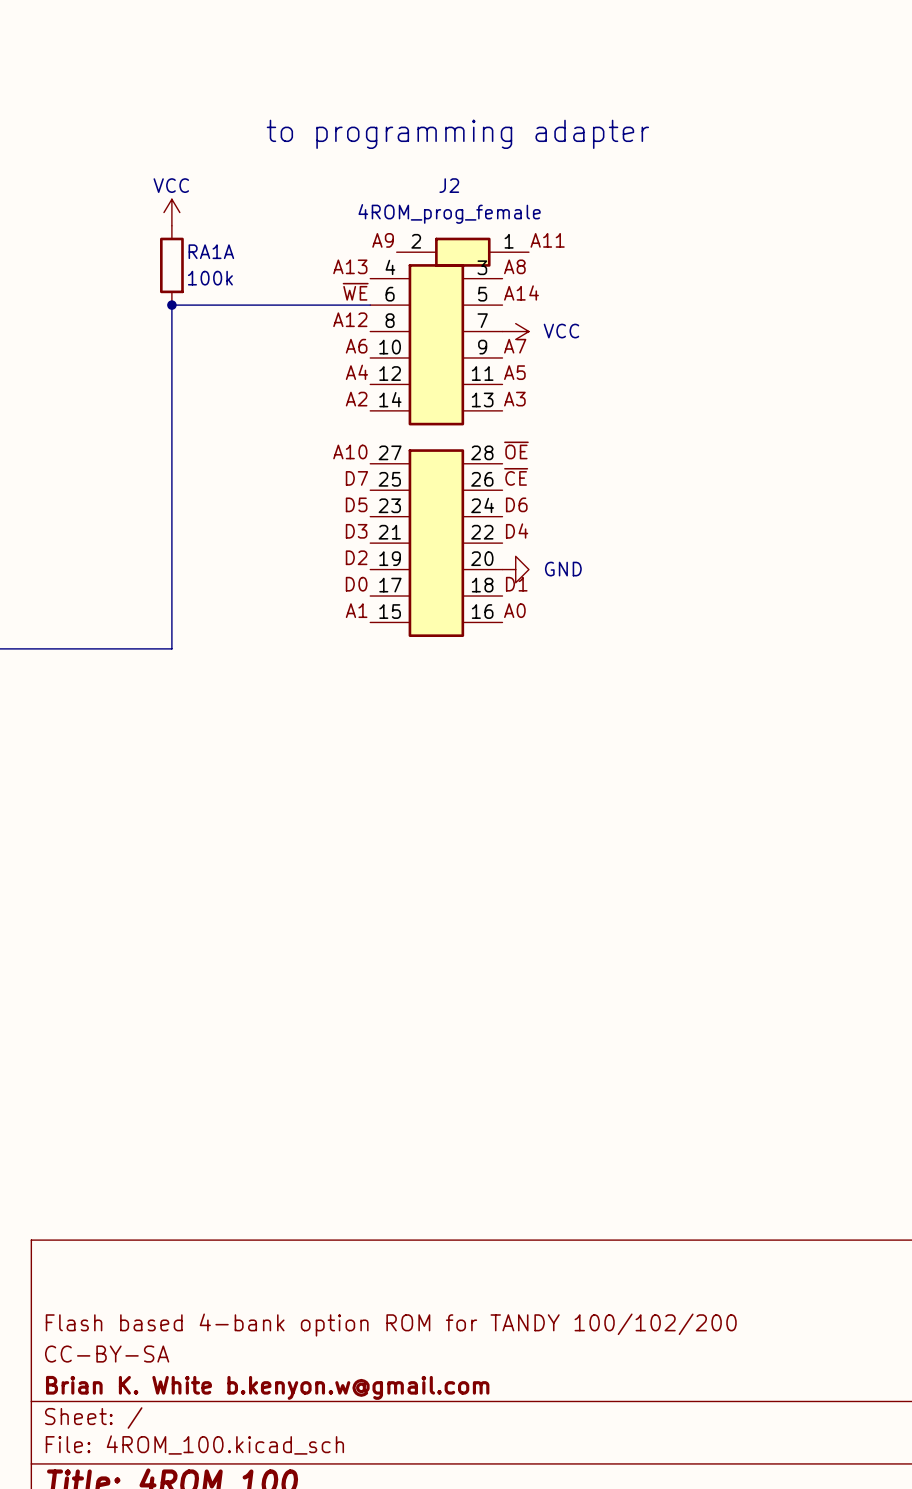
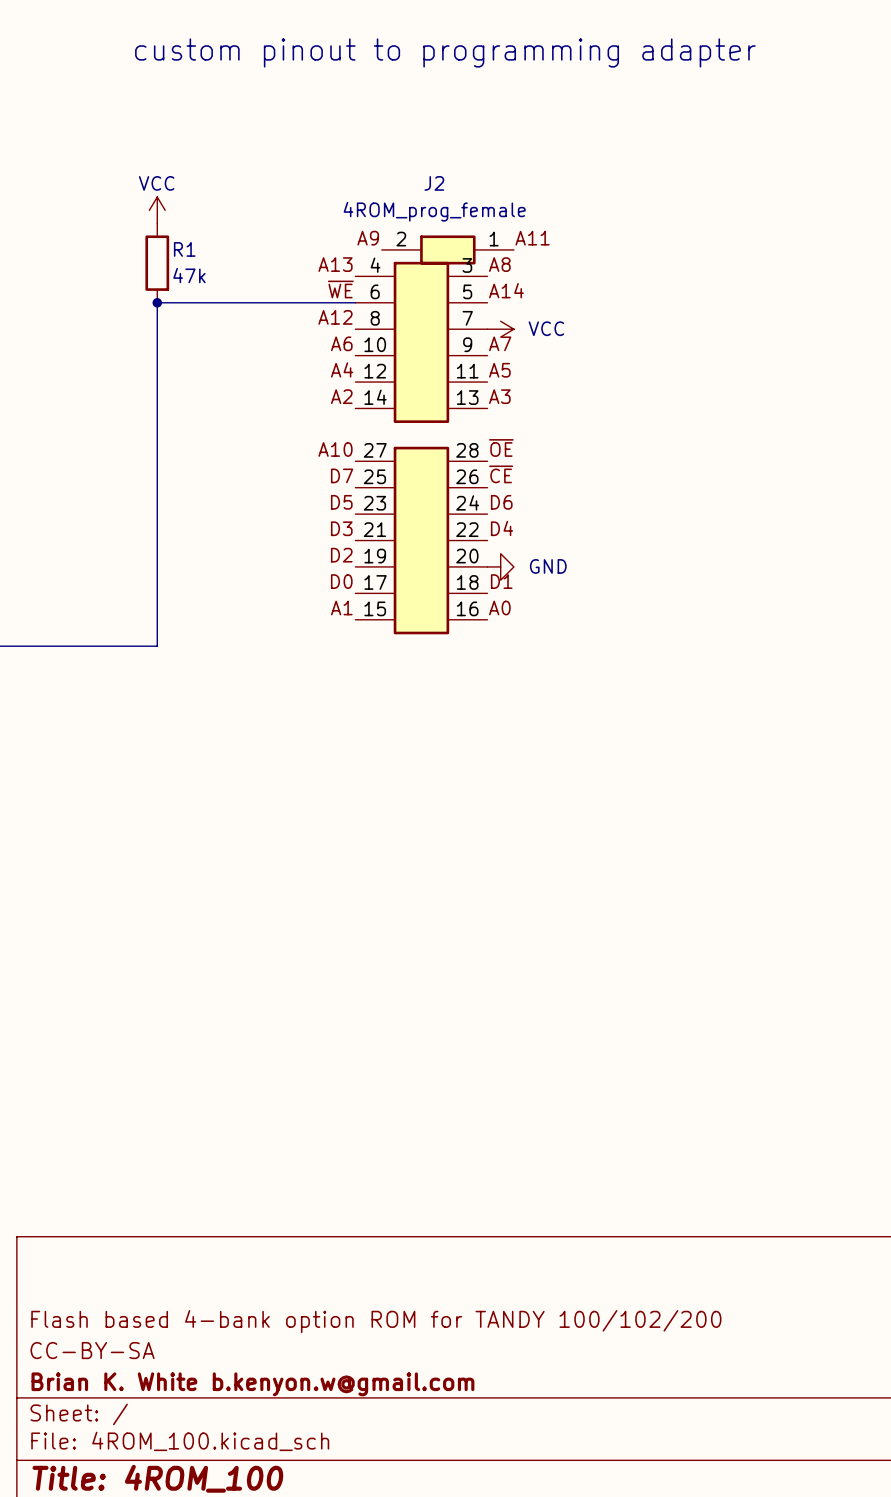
text: none -> custom pinout to programming adapter (445, 52)
text: to programming adapter (457, 134) -> none
RA1A name: RA1A (211, 251) -> R1 (184, 249)
RA1A value: 100k (210, 278) -> 47k (189, 275)

